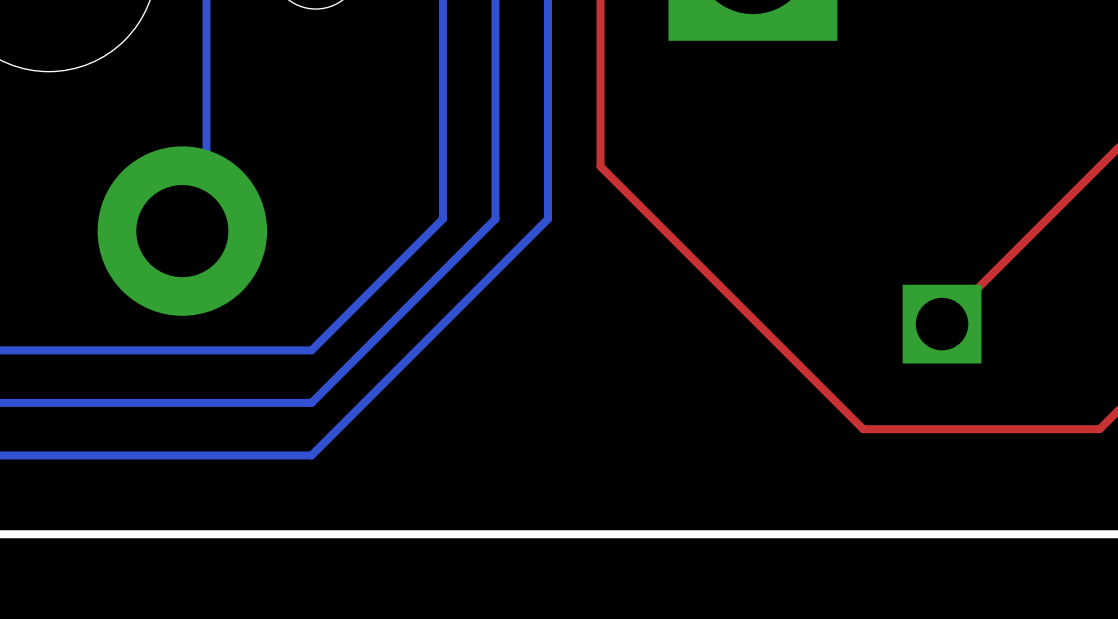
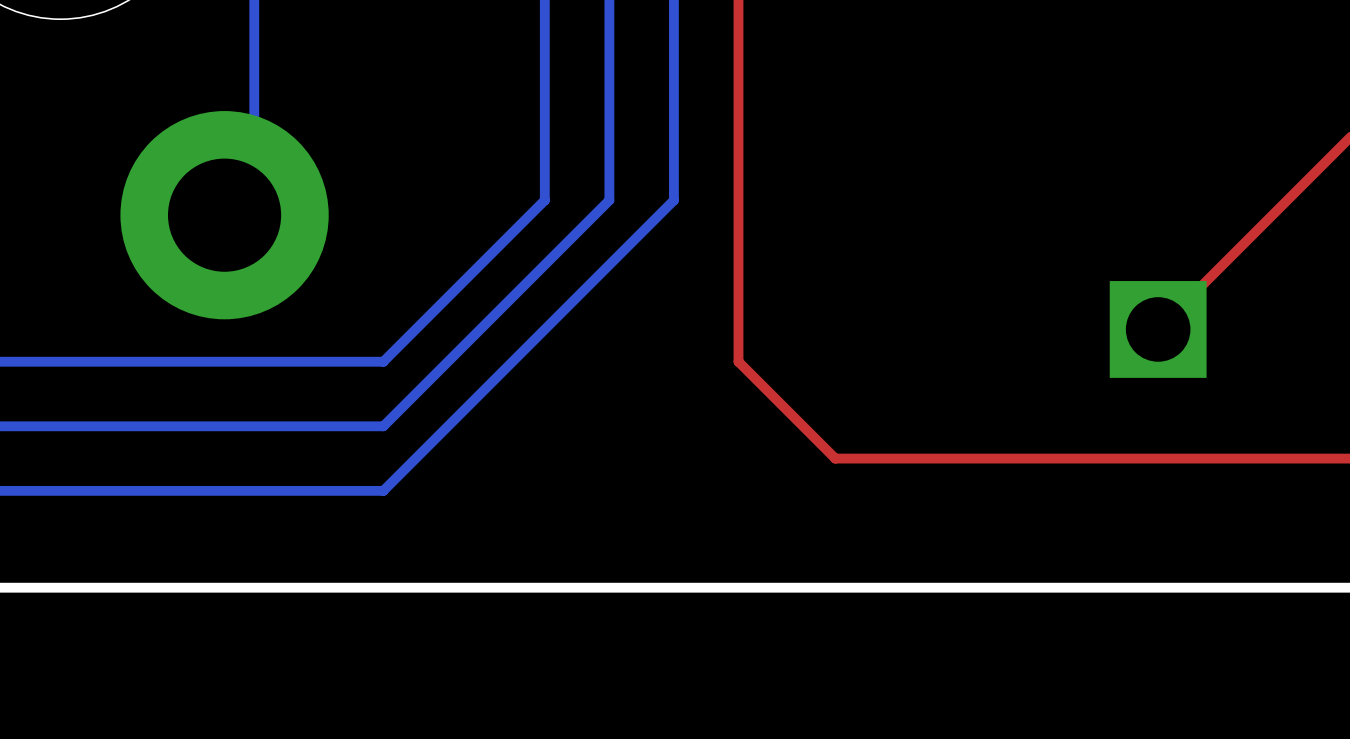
top track: (600, 166) (863, 429) -> (738, 135) (738, 361) (835, 458) (1061, 458)

